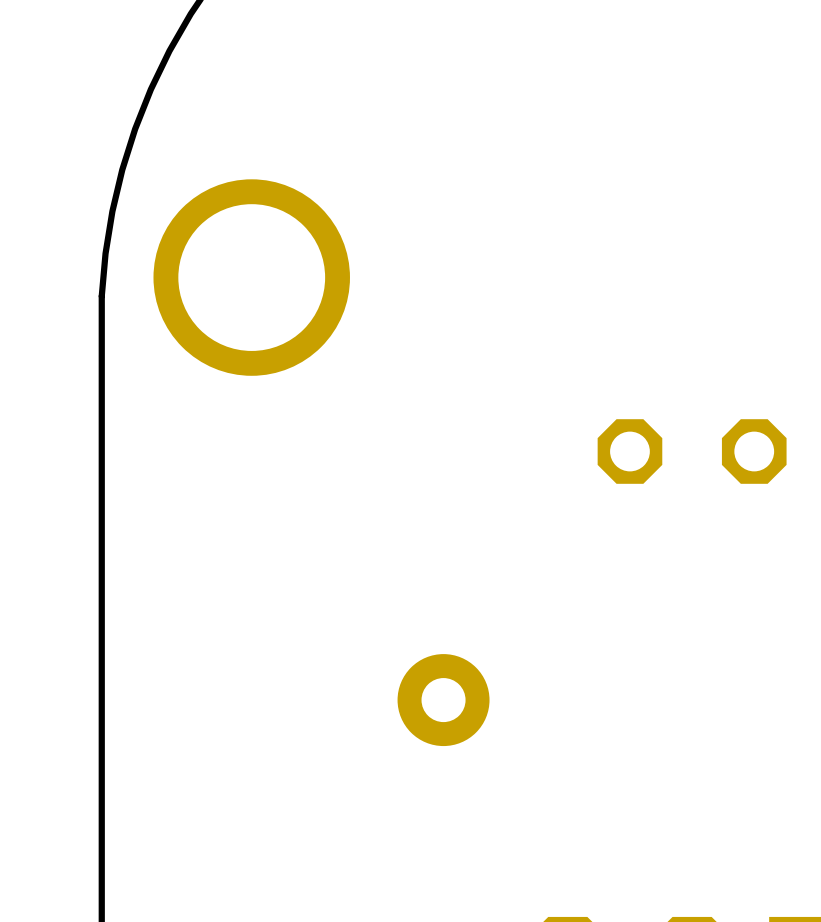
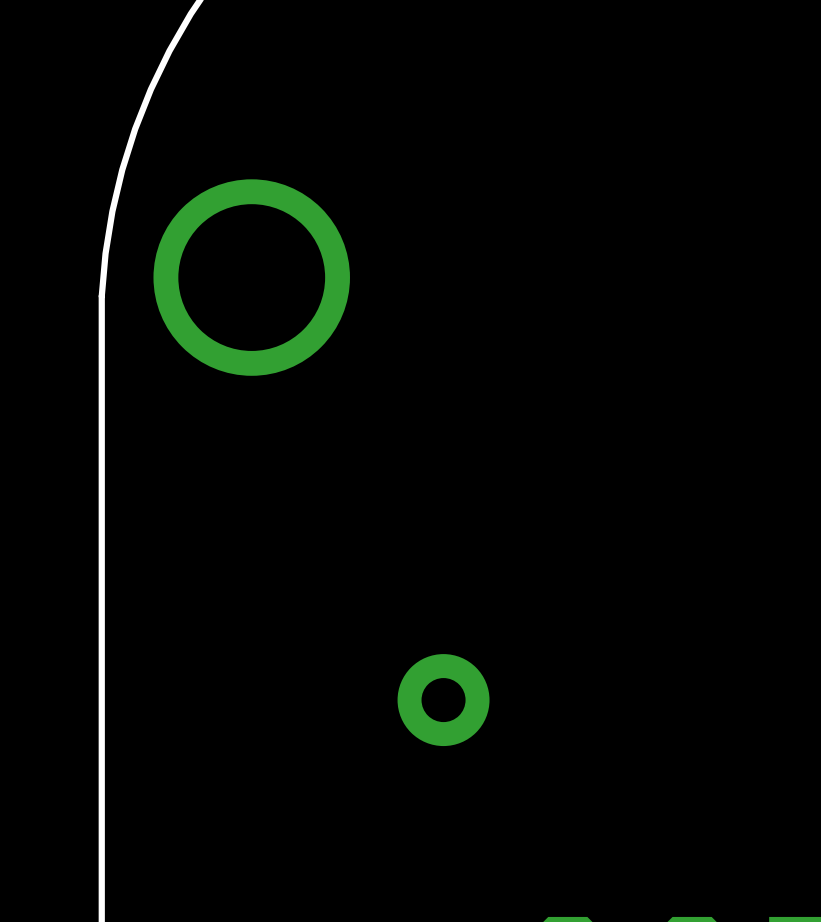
part: (692, 451) -> none

